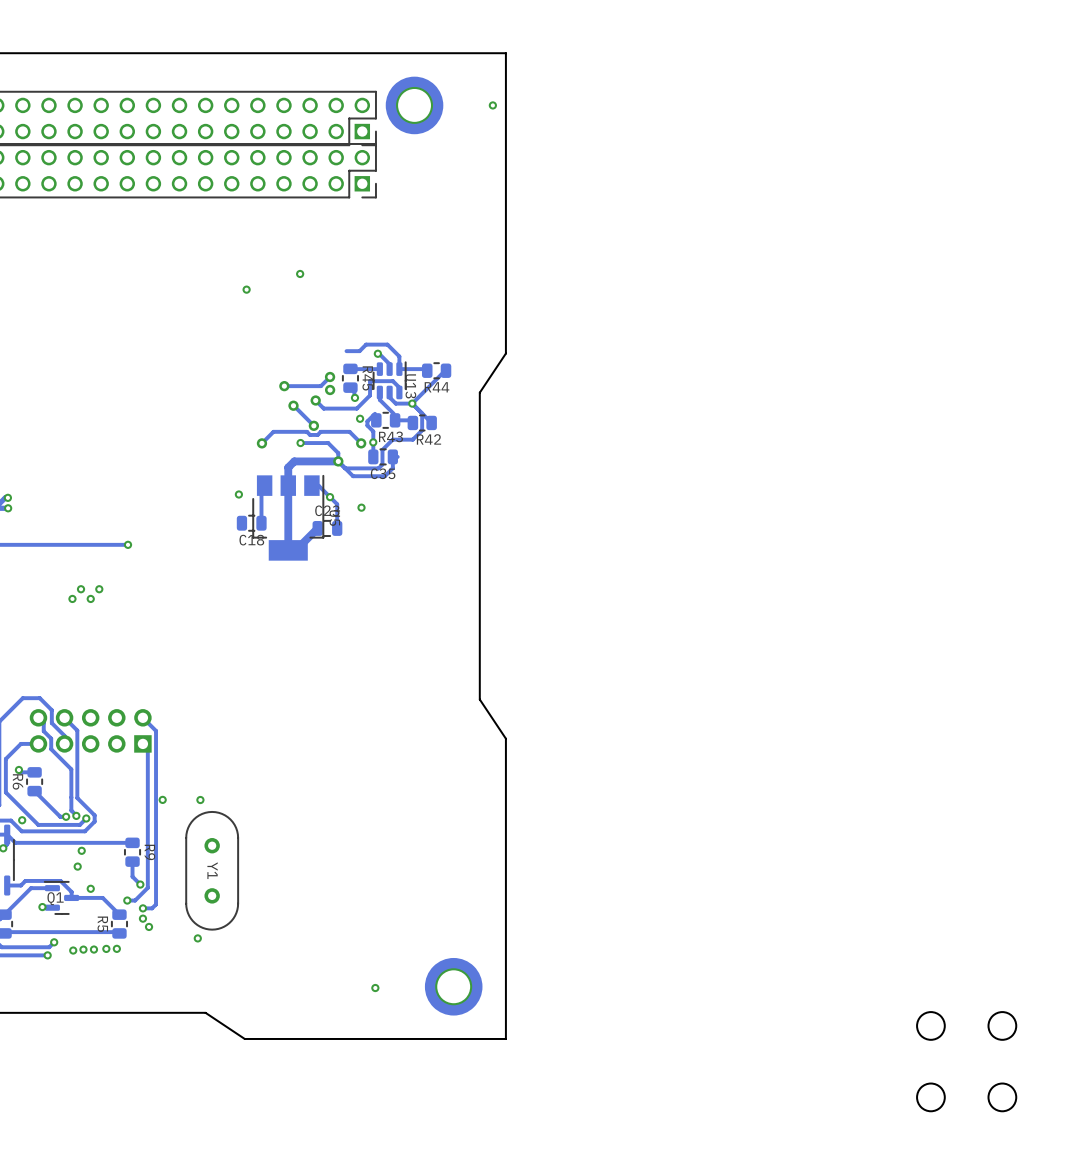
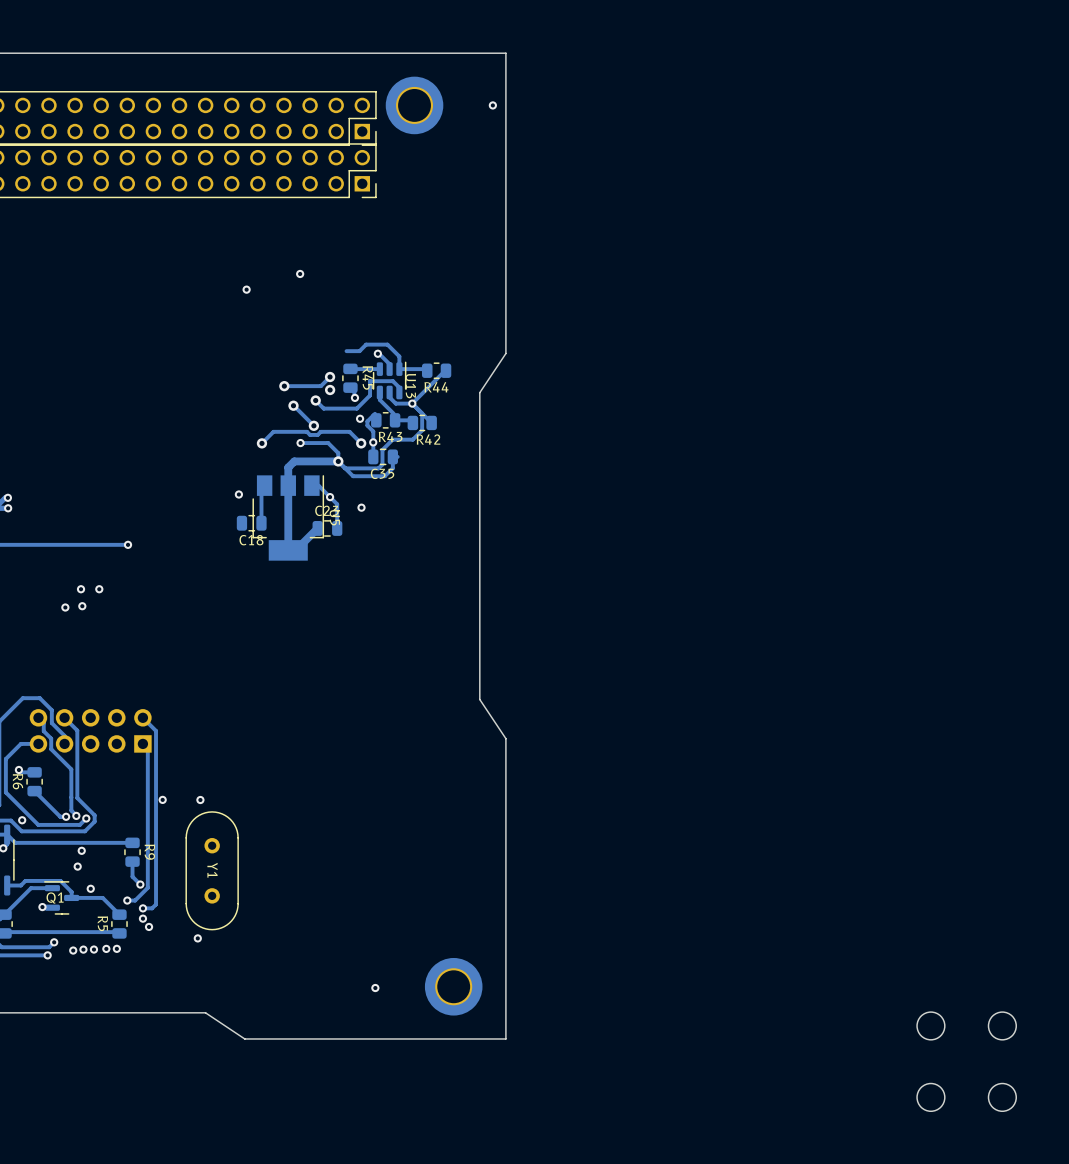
via: (72, 598) -> none
via: (90, 598) -> none
via: none -> (82, 606)
via: none -> (65, 607)

